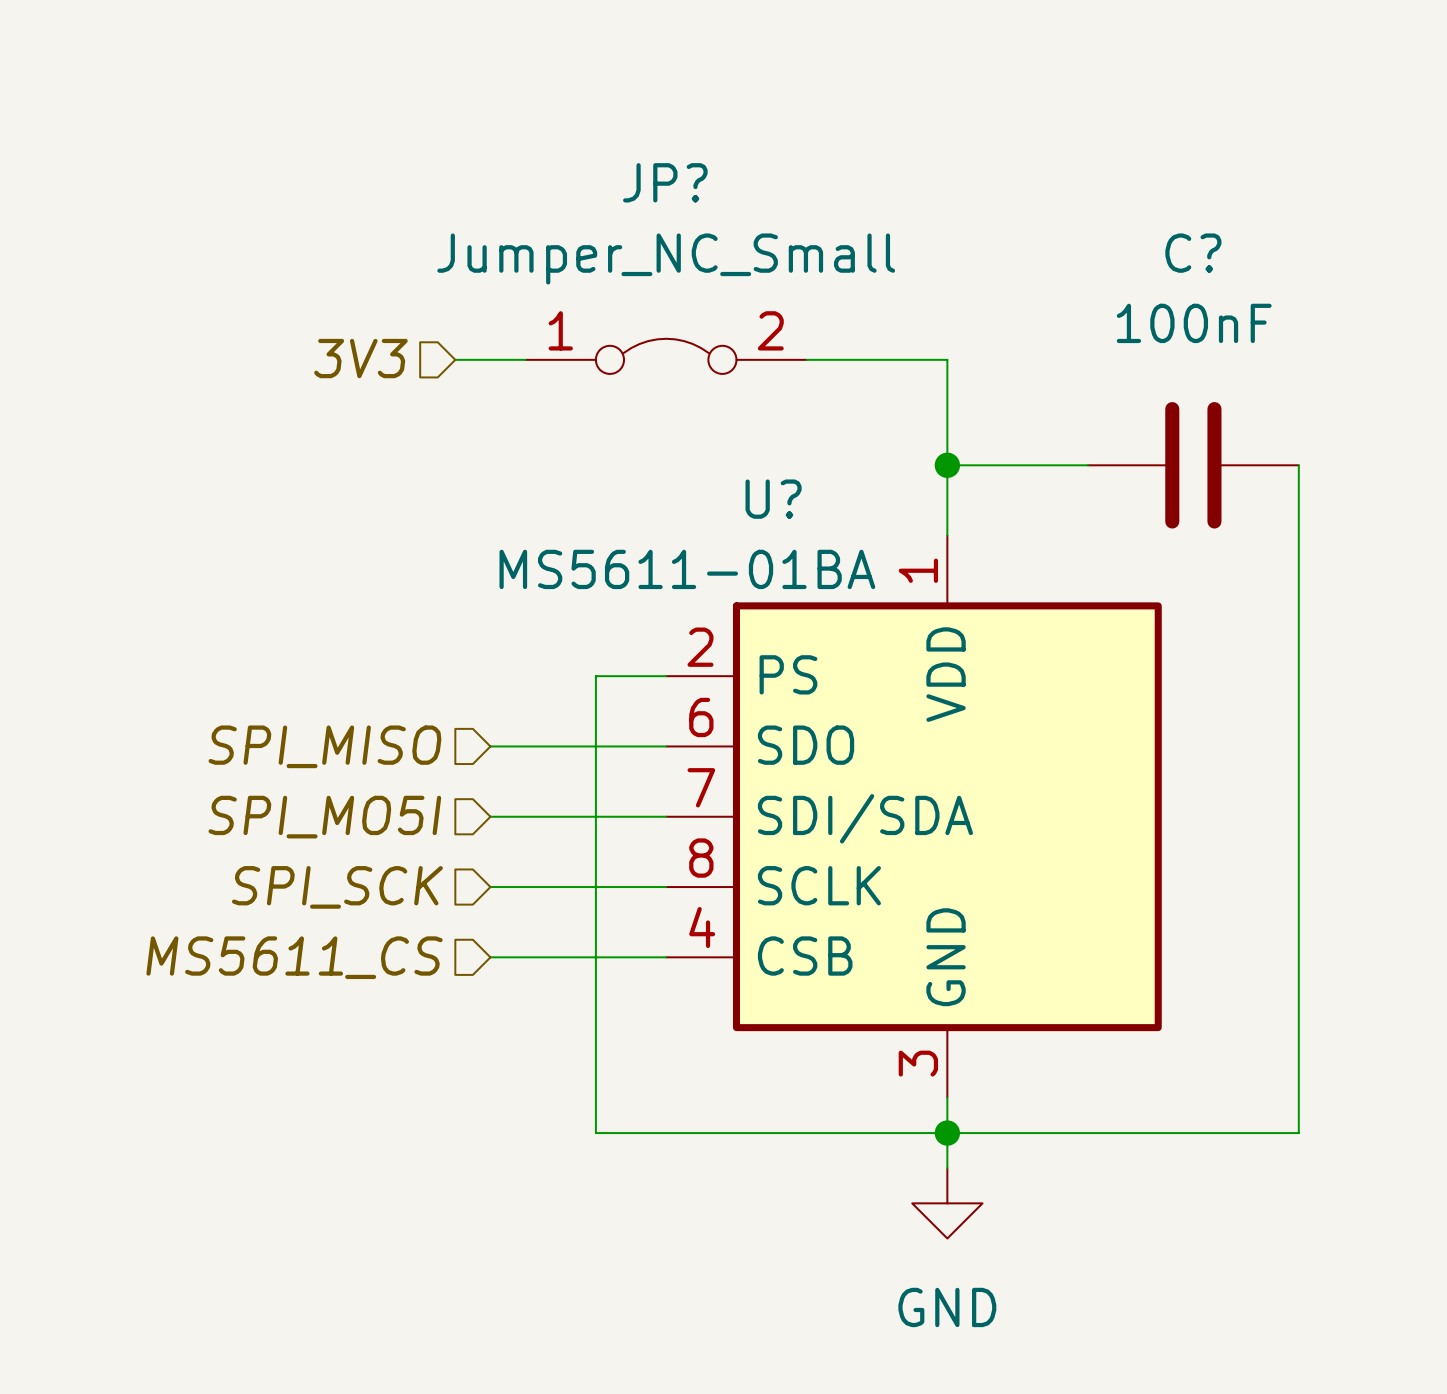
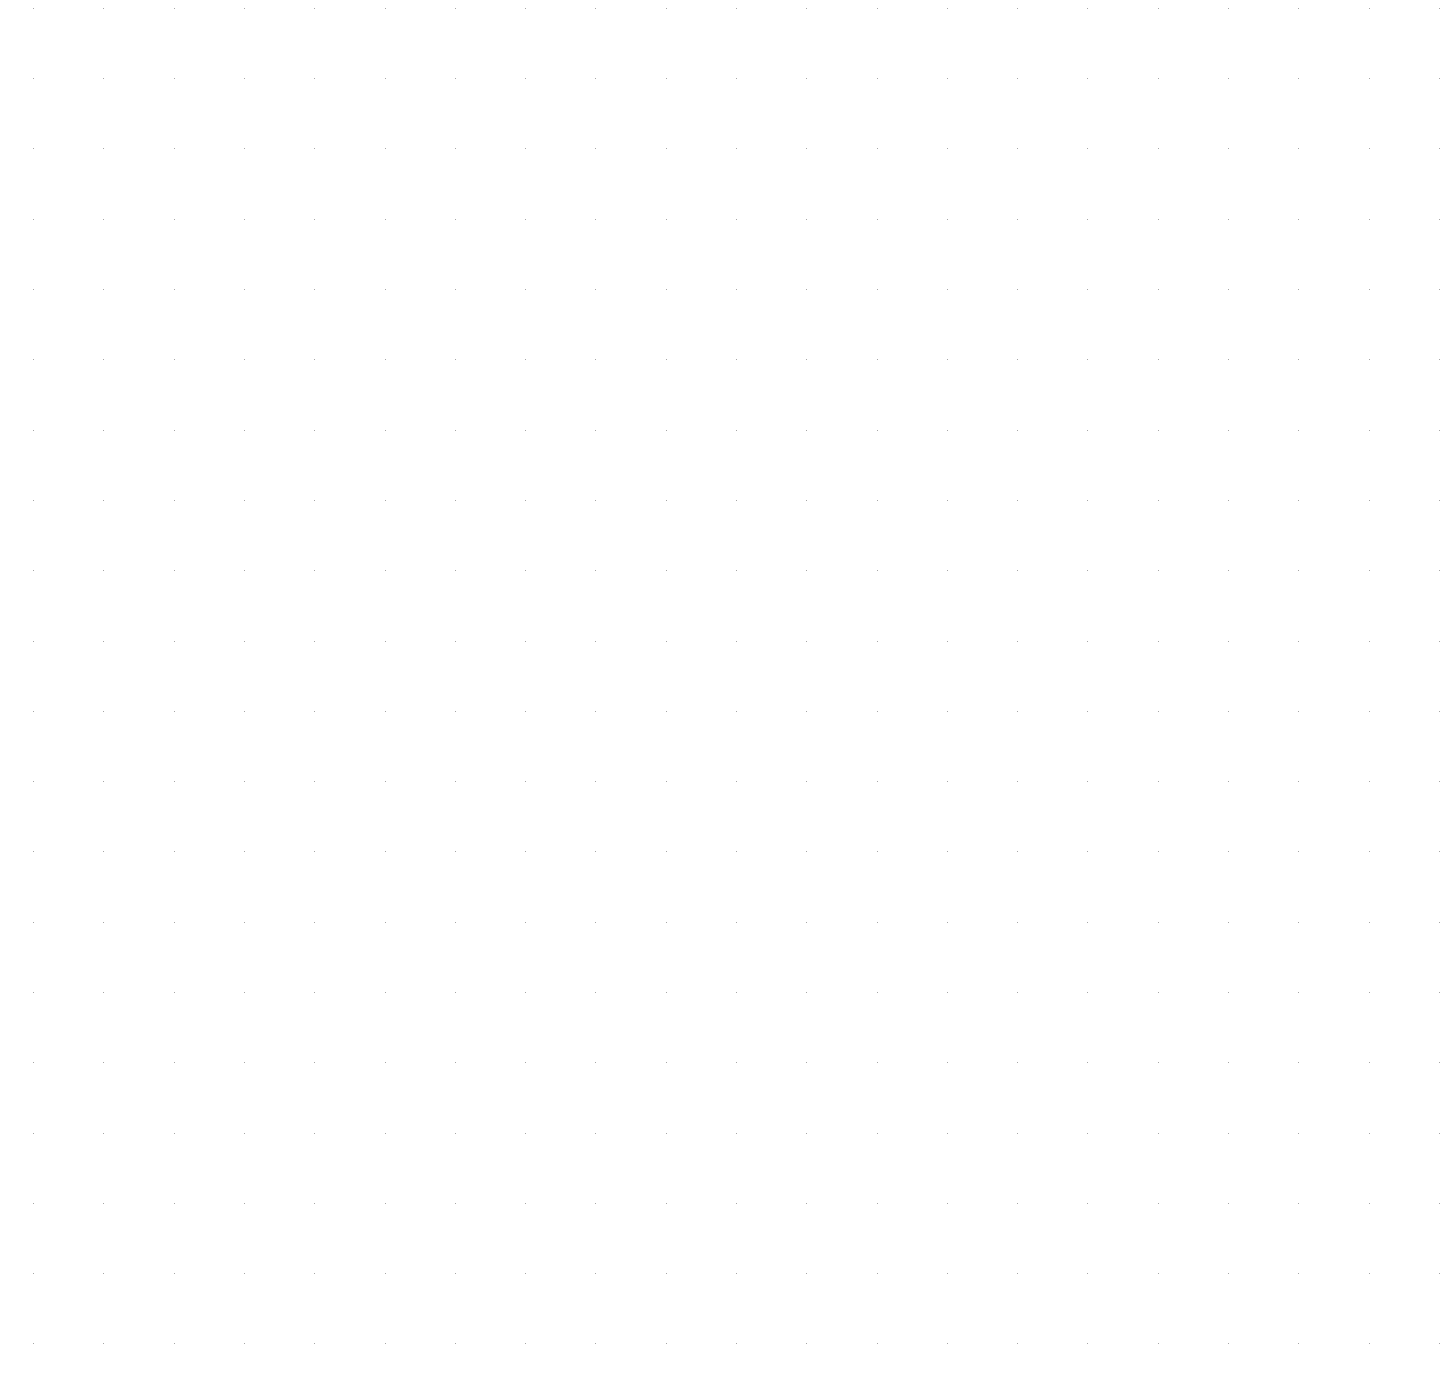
JP?: Jumper_NC_Small (666, 356) -> none
hierarchical label: 3V3 (360, 358) -> none
wire: (455, 359) (525, 359) -> none
wire: (806, 359) (947, 359) (947, 535) -> none
wire: (947, 465) (1087, 465) -> none
junction: (947, 465) -> none
C?: 100nF (1193, 465) -> none
wire: (1298, 465) (1298, 1133) (595, 1133) (595, 676) (666, 676) -> none
hierarchical label: SPI_MISO (324, 746) -> none
wire: (490, 746) (666, 746) -> none
wire: (490, 816) (666, 816) -> none
U?: MS5611-01BA (913, 816) -> none
hierarchical label: SPI_MO5I (324, 817) -> none
hierarchical label: SPI_SCK (337, 887) -> none
wire: (490, 887) (666, 887) -> none
hierarchical label: MS5611_CS (294, 957) -> none
wire: (490, 957) (666, 957) -> none
wire: (947, 1097) (947, 1168) -> none
junction: (947, 1133) -> none
power symbol: GND (947, 1203) -> none

